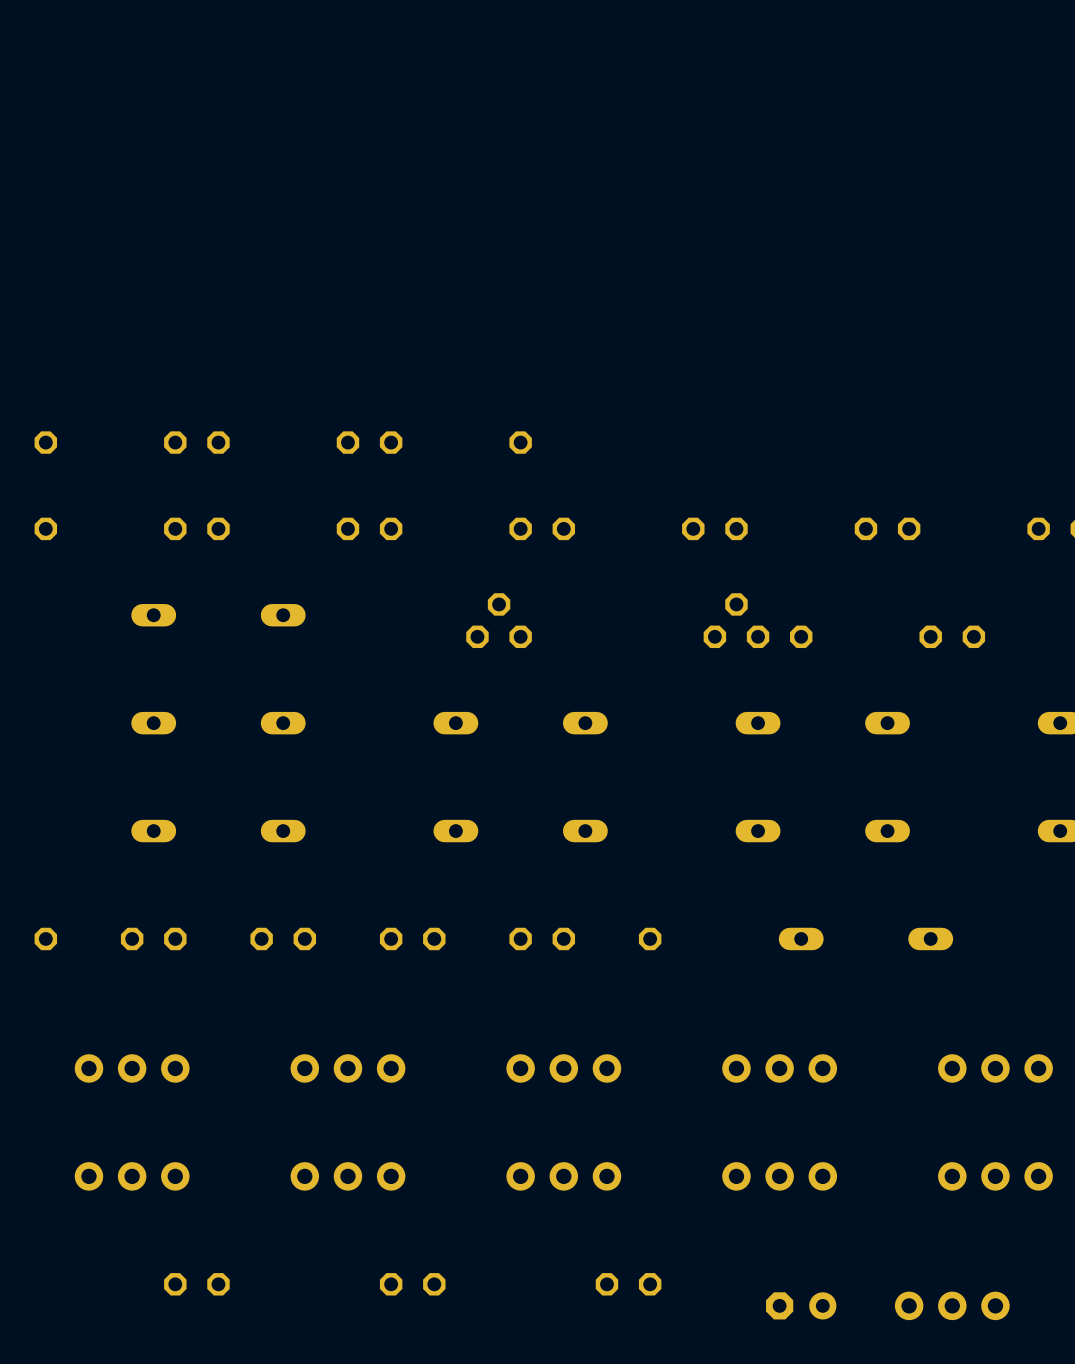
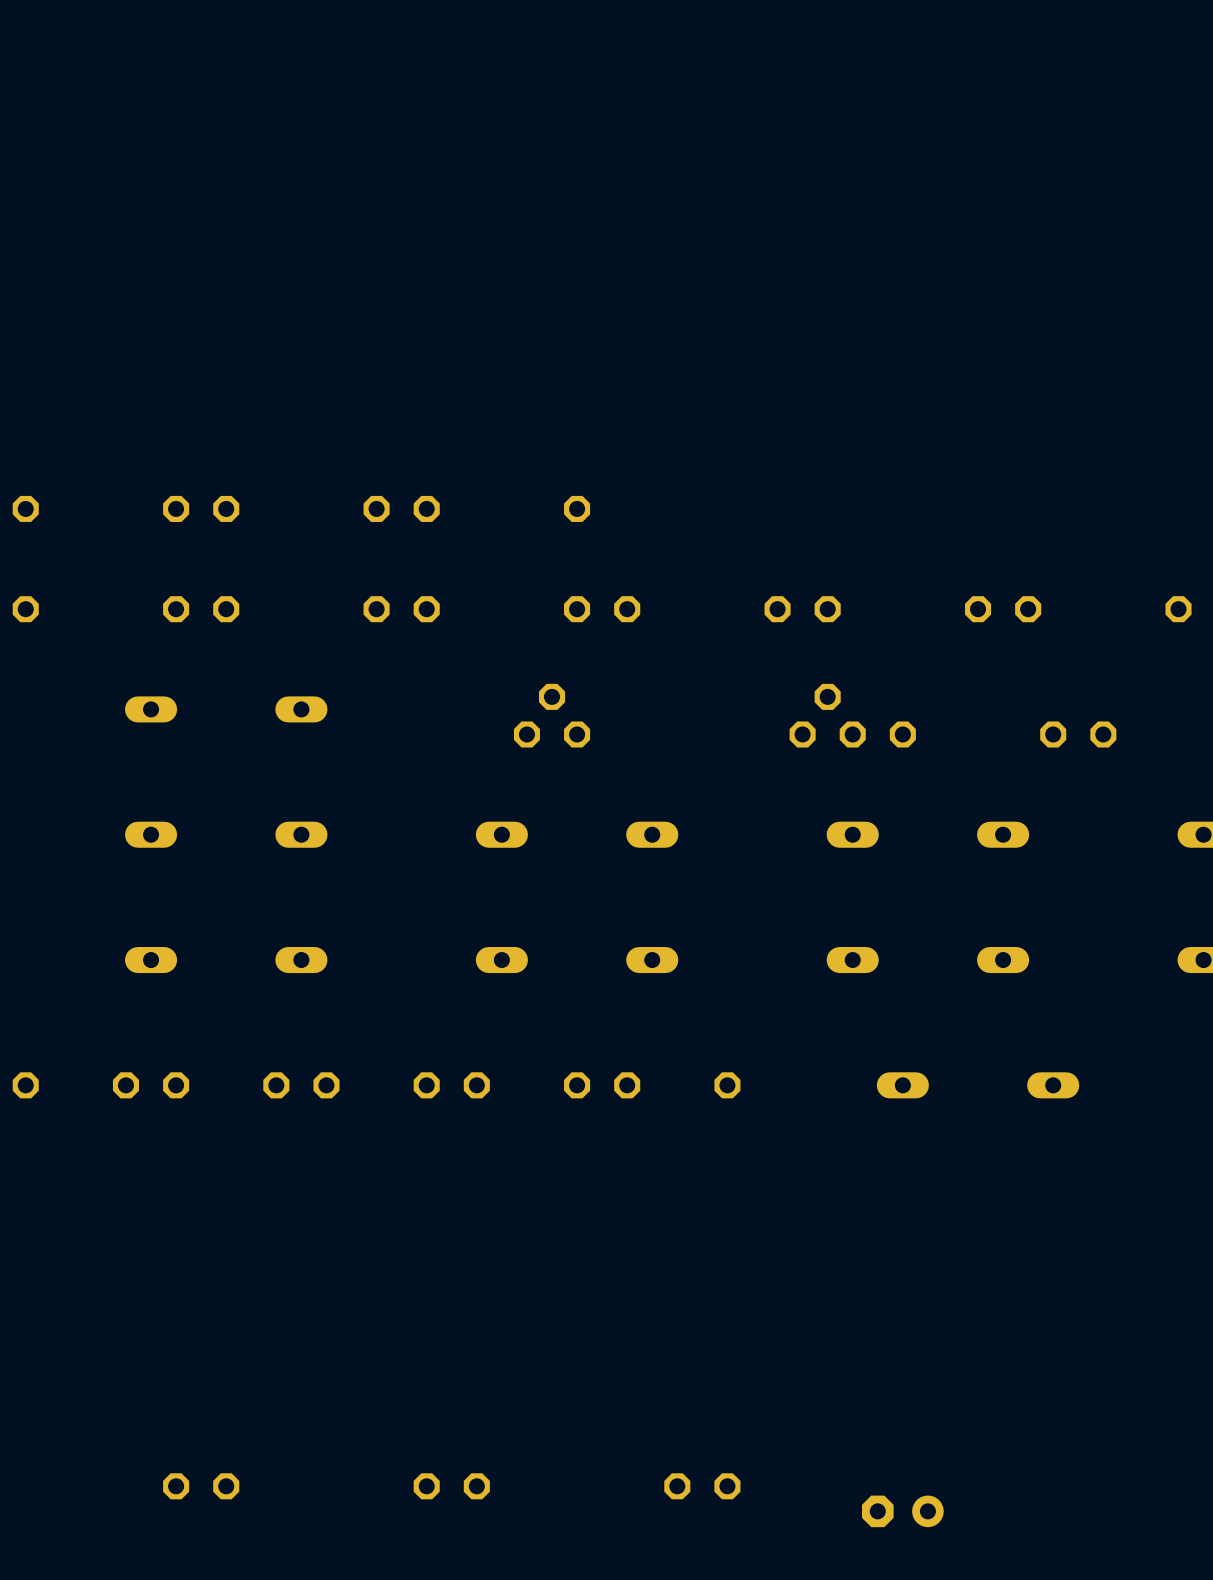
part: (132, 1068) -> none
part: (347, 1068) -> none
part: (563, 1068) -> none
part: (779, 1068) -> none
part: (995, 1068) -> none
part: (132, 1176) -> none
part: (347, 1176) -> none
part: (563, 1176) -> none
part: (779, 1176) -> none
part: (995, 1176) -> none
part: (952, 1305) -> none

